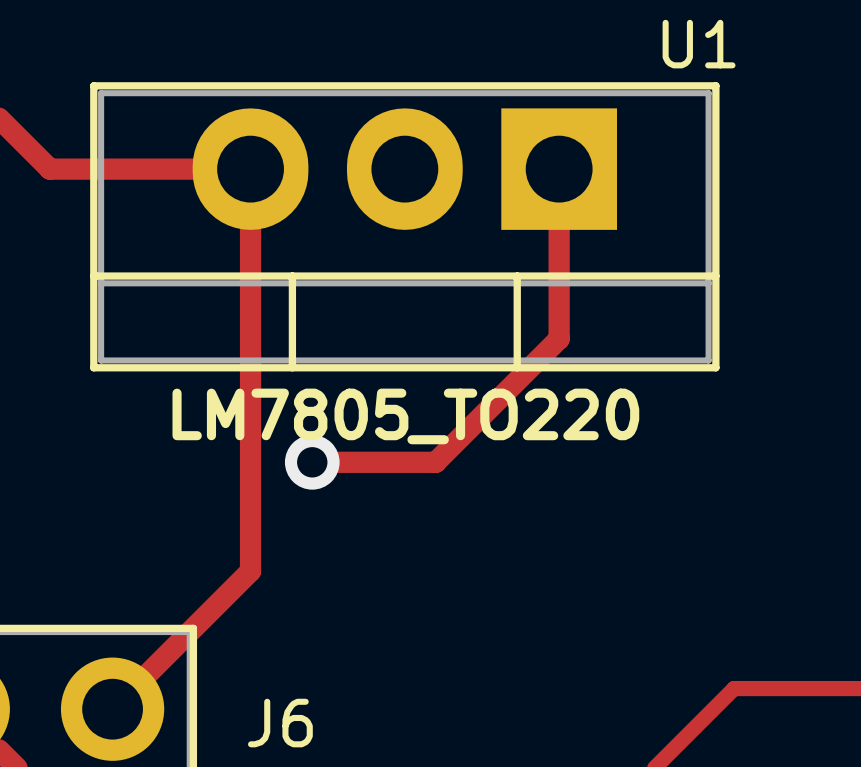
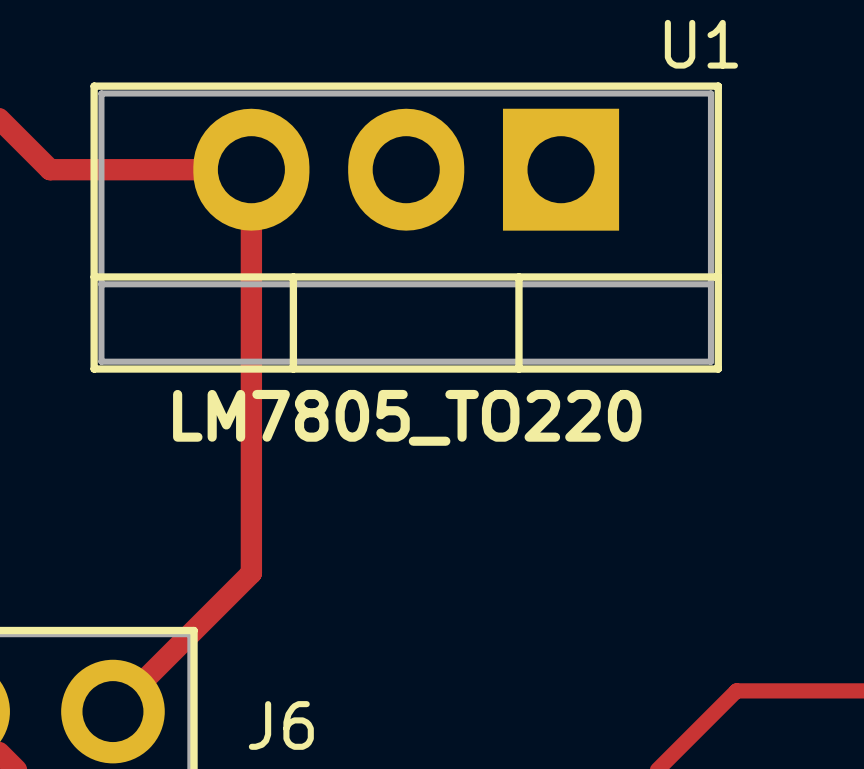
track: (559, 169) (559, 338) (435, 462) (312, 462) -> none
via: (312, 462) -> none

